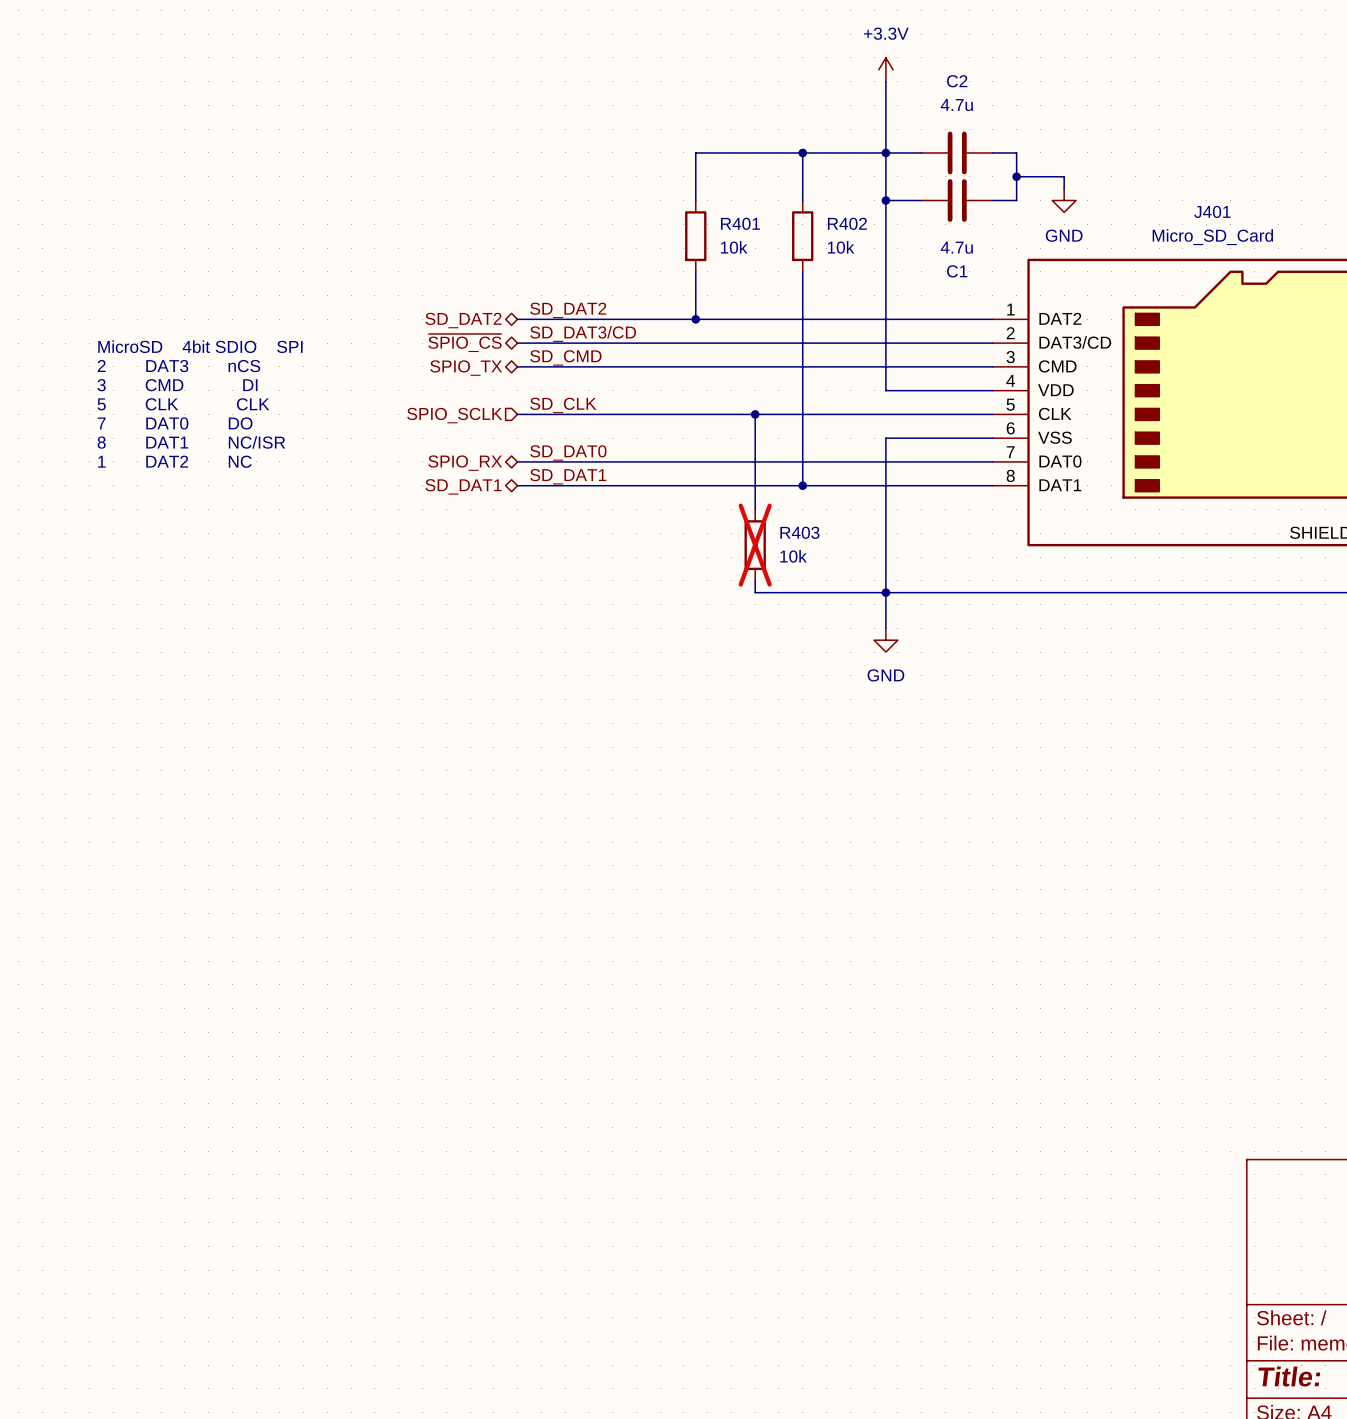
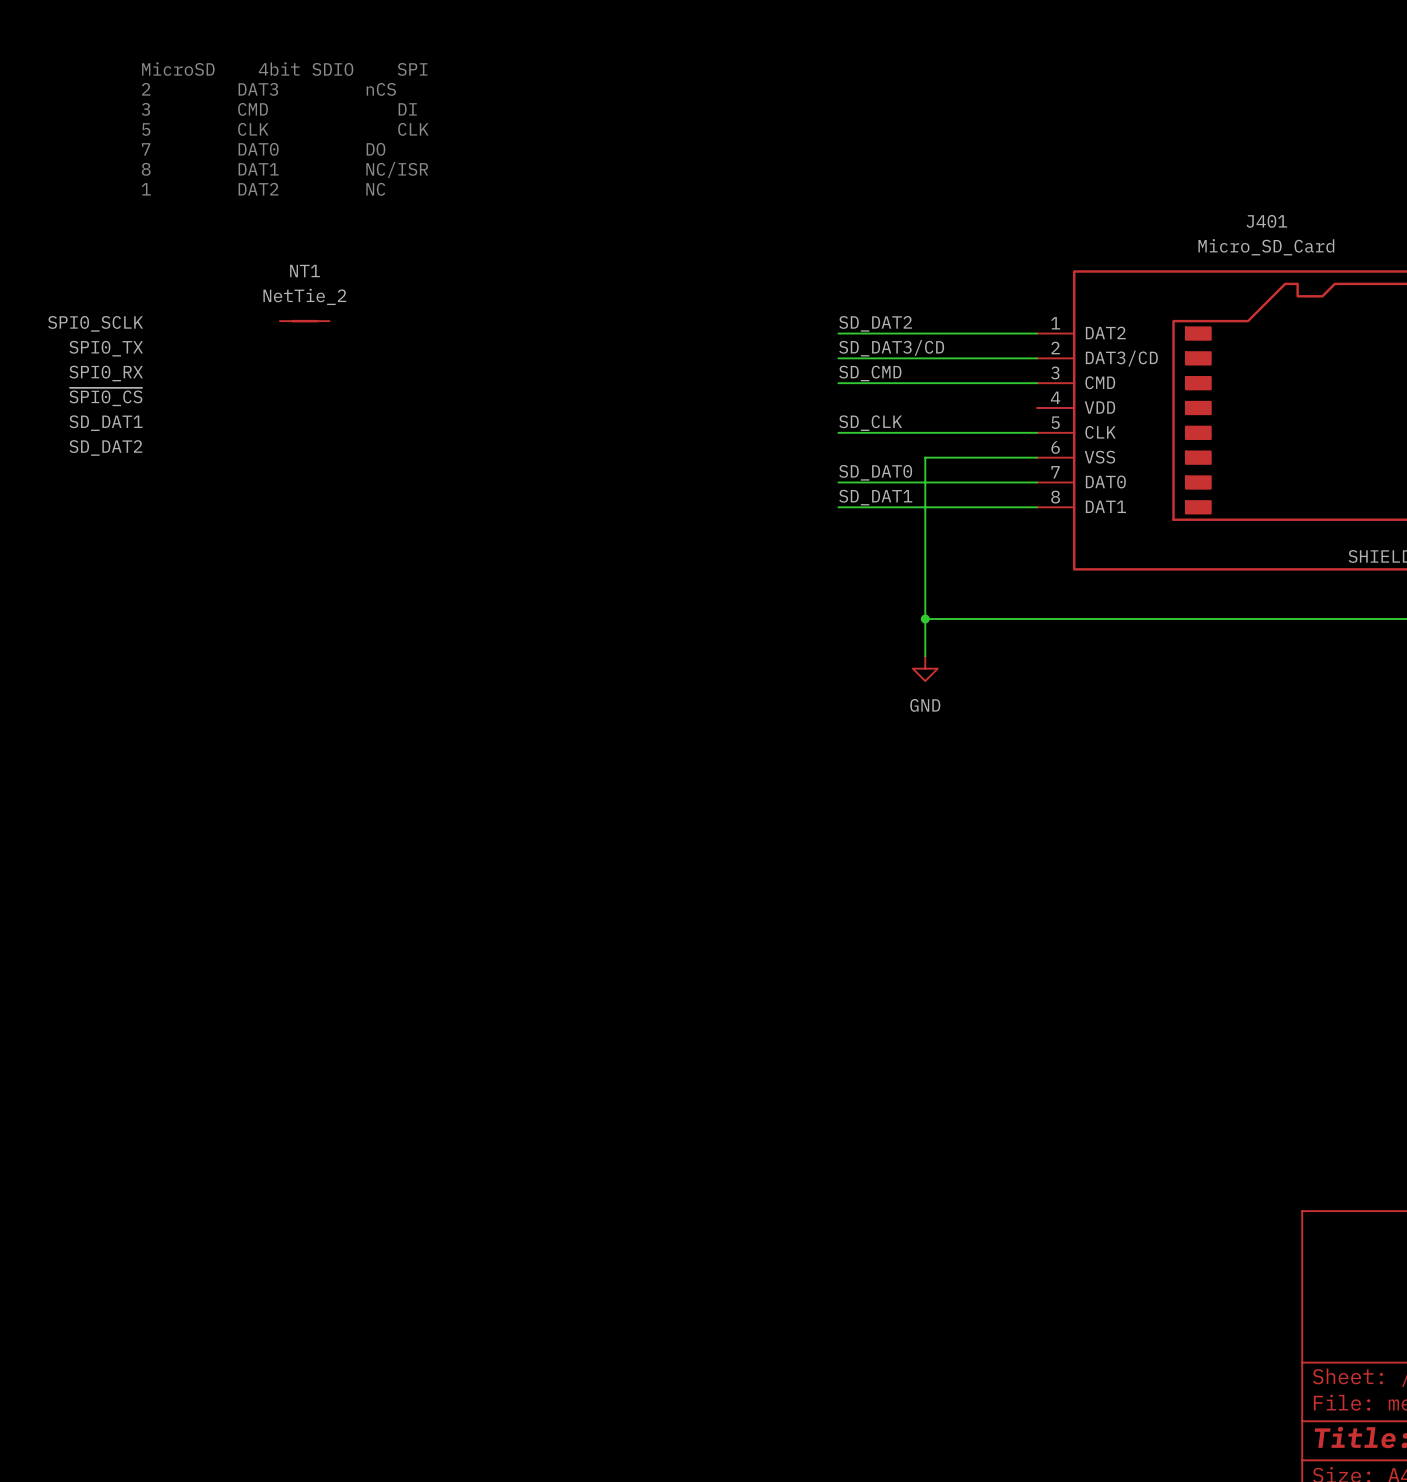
text: none -> MicroSD 4bit SDIO SPI (284, 69)
power symbol: +3.3V (885, 69) -> none
wire: (885, 81) (885, 390) (992, 390) -> none
text: none -> 2 DAT3 nCS (268, 89)
text: none -> 3 CMD DI (279, 109)
text: none -> 5 CLK CLK (285, 129)
text: none -> 7 DAT0 DO (263, 149)
wire: (802, 152) (802, 200) -> none
junction: (802, 152) -> none
junction: (885, 152) -> none
wire: (921, 152) (695, 152) (695, 200) -> none
C2: 4.7u (957, 152) -> none
wire: (992, 152) (1016, 152) (1016, 200) (992, 200) -> none
text: none -> 8 DAT1 NC/ISR (284, 170)
wire: (1016, 176) (1064, 176) (1064, 188) -> none
junction: (1016, 176) -> none
text: none -> 1 DAT2 NC (263, 189)
wire: (885, 200) (921, 200) -> none
junction: (885, 200) -> none
C1: 4.7u (957, 200) -> none
power symbol: GND (1064, 200) -> none
R401: 10k (695, 236) -> none
R402: 10k (802, 236) -> none
wire: (695, 271) (695, 319) -> none
wire: (802, 271) (802, 485) (517, 485) -> none
NT1: none -> NetTie_2 (304, 321)
label: none -> SPI0_SCLK (95, 323)
label: SD_DAT2 (568, 310) -> none
label: none -> SD_DAT2 (875, 323)
wire: (517, 319) (802, 319) -> none
junction: (695, 319) -> none
hierarchical label: SD_DAT2 (463, 320) -> none
label: SD_DAT3/CD (583, 333) -> none
label: none -> SD_DAT3/CD (891, 348)
label: none -> SPI0_TX (106, 348)
hierarchical label: ~{SPIO_CS} (464, 343) -> none
wire: (517, 343) (802, 343) -> none
text: MicroSD 4bit SDIO SPI (200, 346) -> none
label: none -> SPI0_RX (106, 373)
label: SD_CMD (565, 357) -> none
label: none -> SD_CMD (870, 373)
text: 2 DAT3 nCS (178, 366) -> none
wire: (517, 366) (802, 366) -> none
hierarchical label: SPIO_TX (466, 368) -> none
label: none -> ~{SPI0_CS} (105, 397)
text: 3 CMD DI (177, 385) -> none
text: 5 CLK CLK (183, 404) -> none
label: none -> SD_DAT1 (106, 423)
label: SD_CLK (563, 405) -> none
label: none -> SD_CLK (870, 423)
wire: (517, 414) (802, 414) -> none
wire: (755, 414) (755, 509) -> none
junction: (755, 414) -> none
hierarchical label: SPIO_SCLK (454, 415) -> none
text: 7 DAT0 DO (175, 423) -> none
label: none -> SD_DAT2 (105, 447)
text: 8 DAT1 NC/ISR (191, 442) -> none
label: SD_DAT0 (568, 452) -> none
label: none -> SD_DAT0 (875, 472)
text: 1 DAT2 NC (174, 461) -> none
wire: (517, 461) (802, 461) -> none
hierarchical label: SPIO_RX (465, 463) -> none
label: SD_DAT1 (568, 476) -> none
label: none -> SD_DAT1 (875, 497)
junction: (802, 485) -> none
hierarchical label: SD_DAT1 (463, 486) -> none
R403: 10k (755, 545) -> none
wire: (755, 580) (755, 592) (885, 592) -> none

